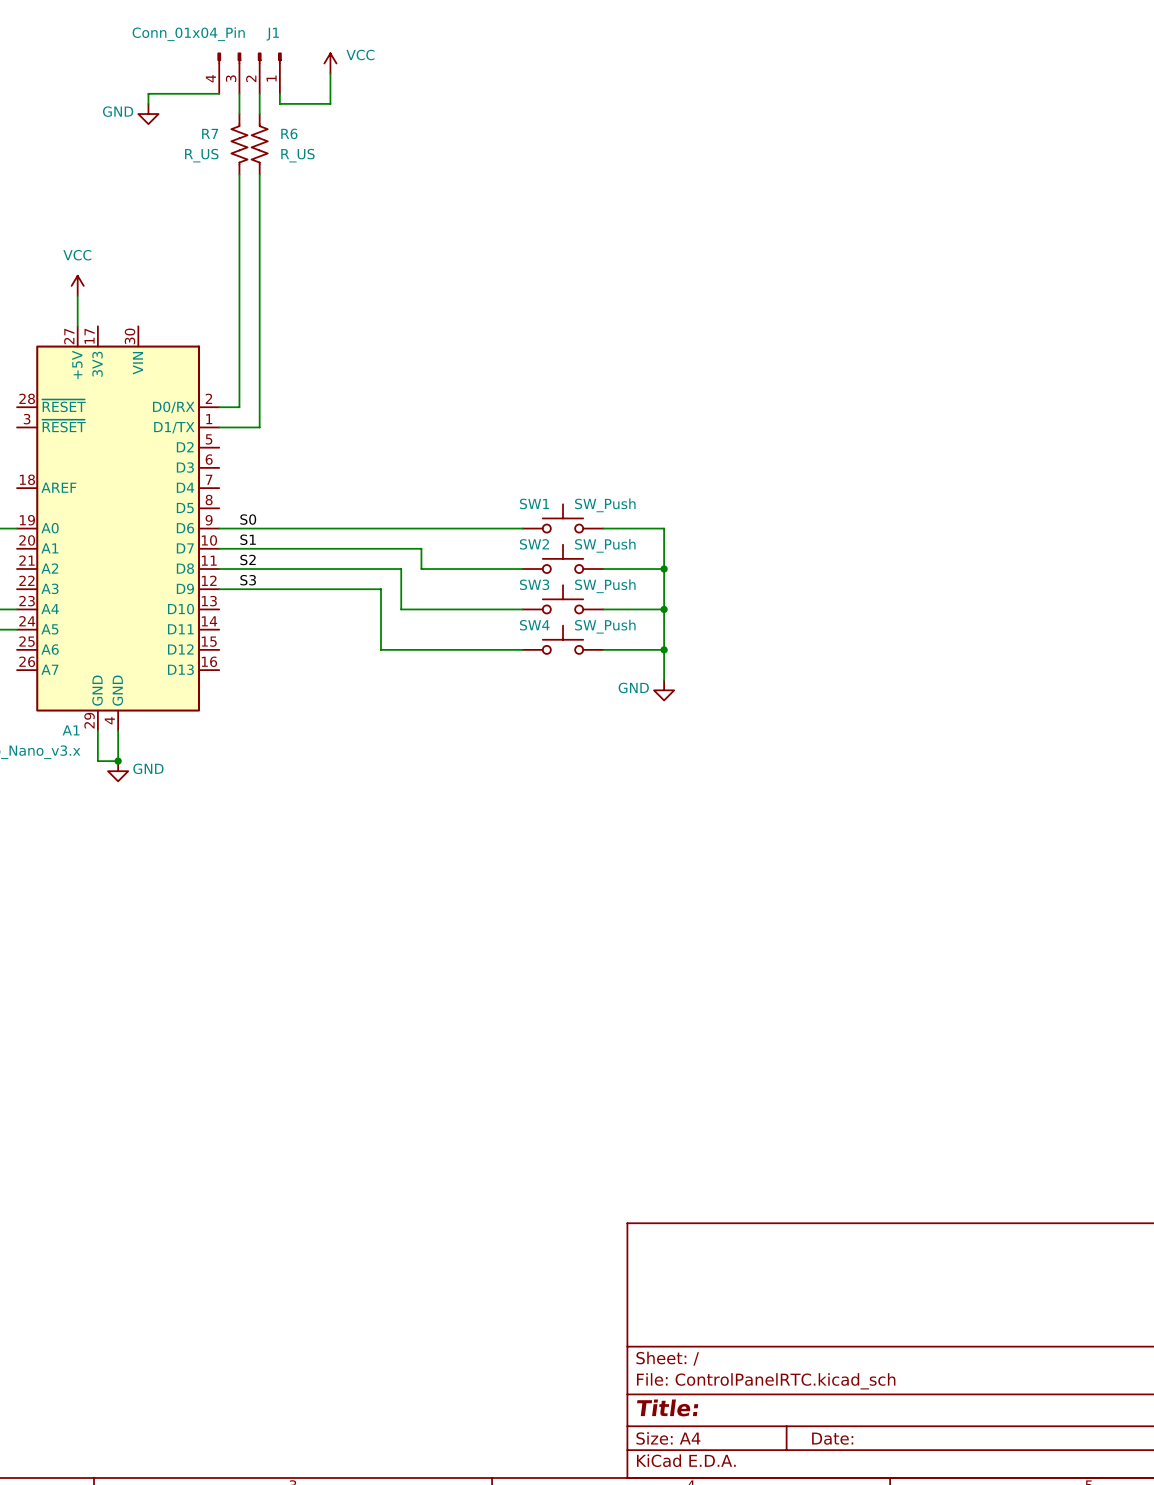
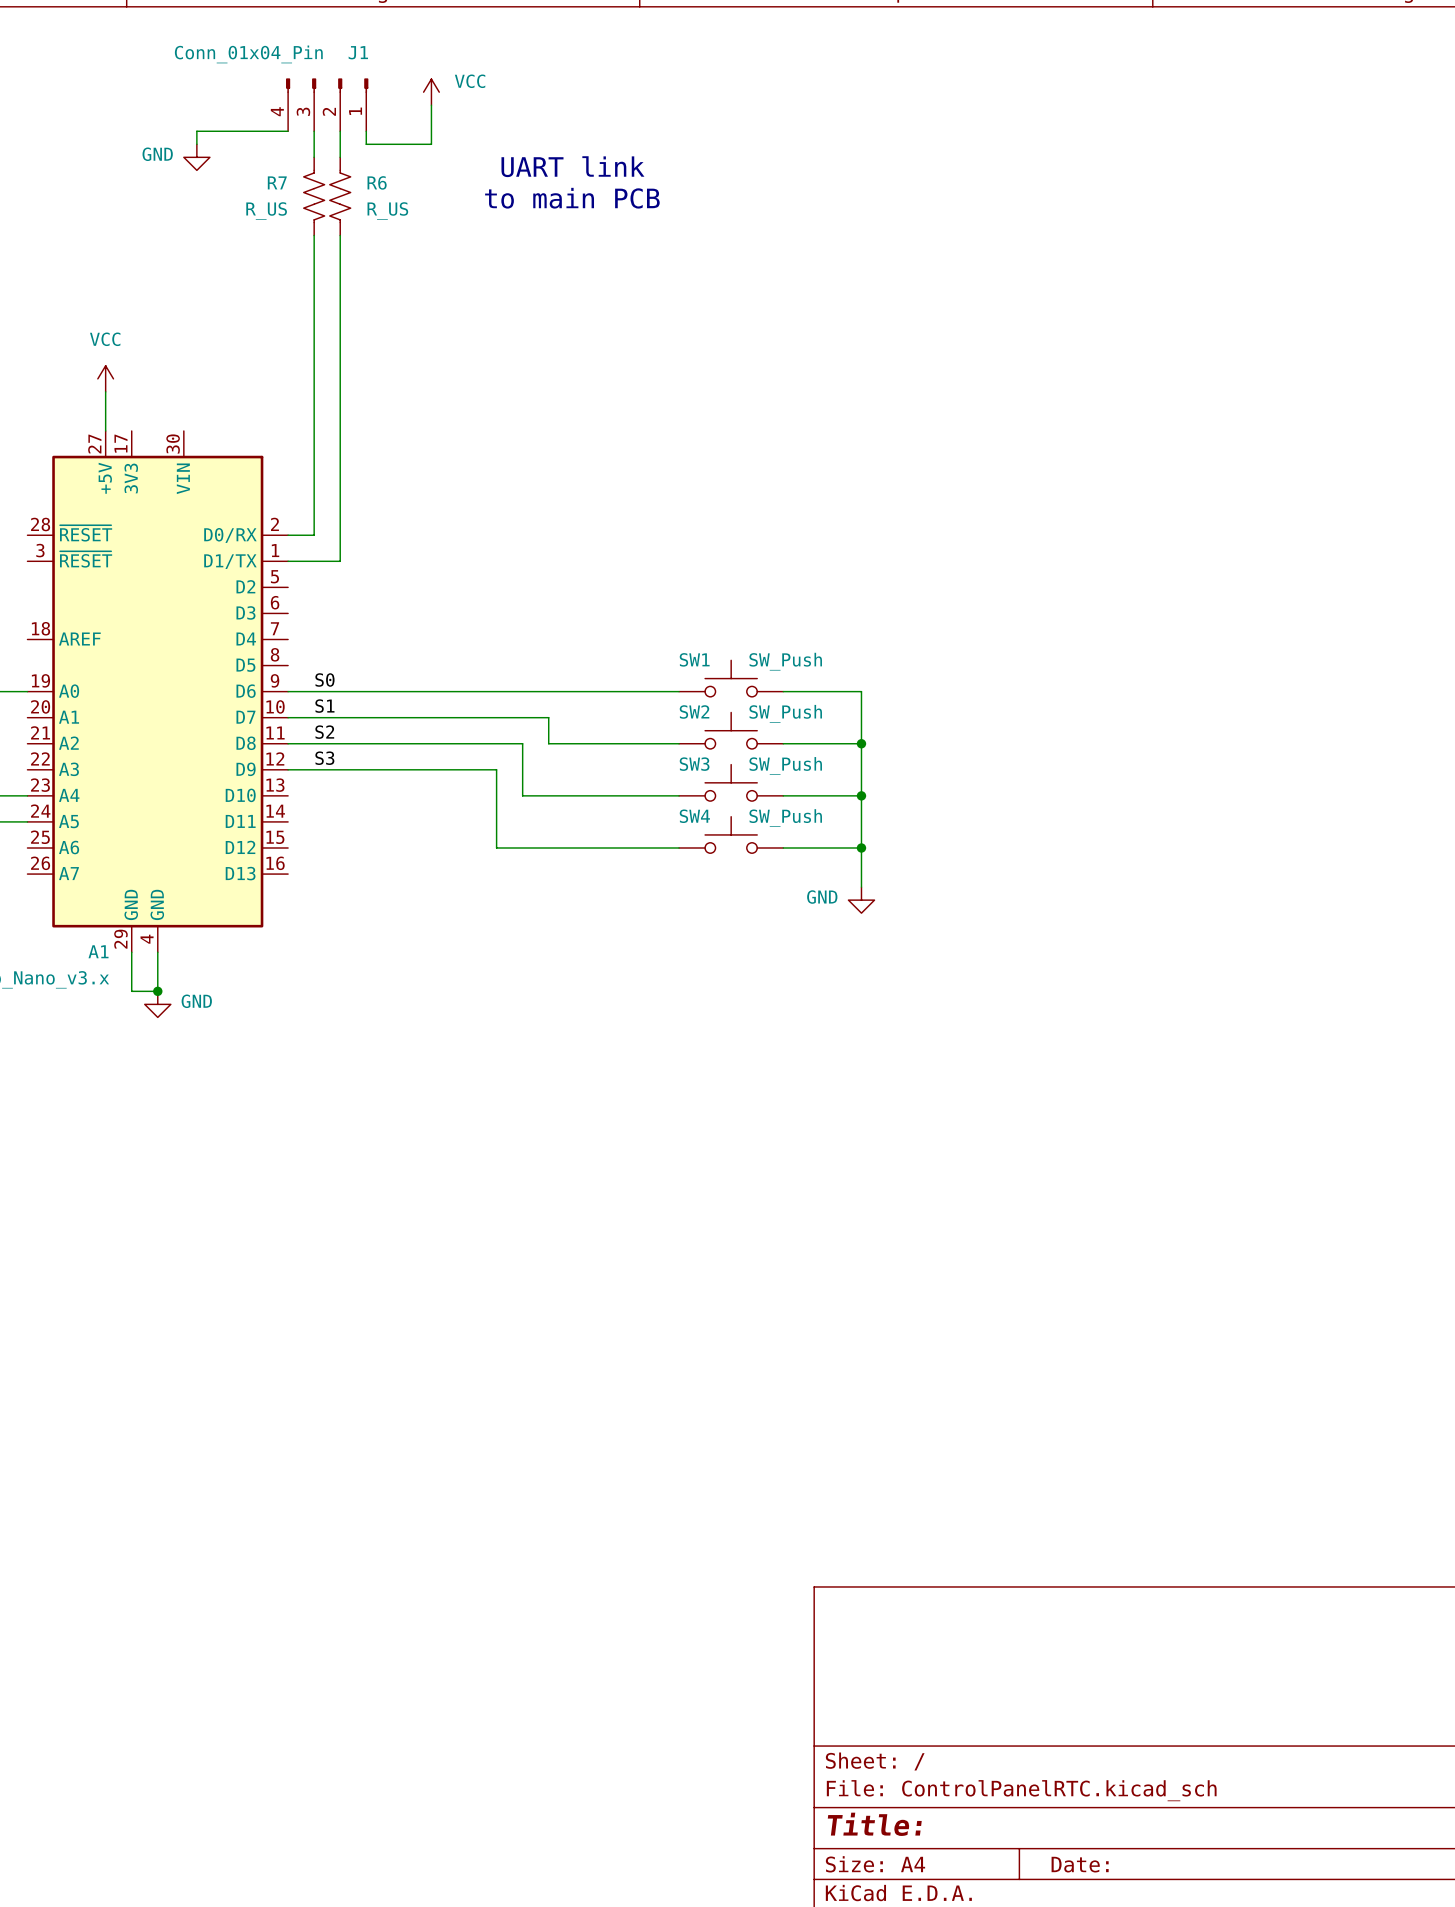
text: none -> UART link (572, 166)
text: none -> to main PCB (572, 198)

